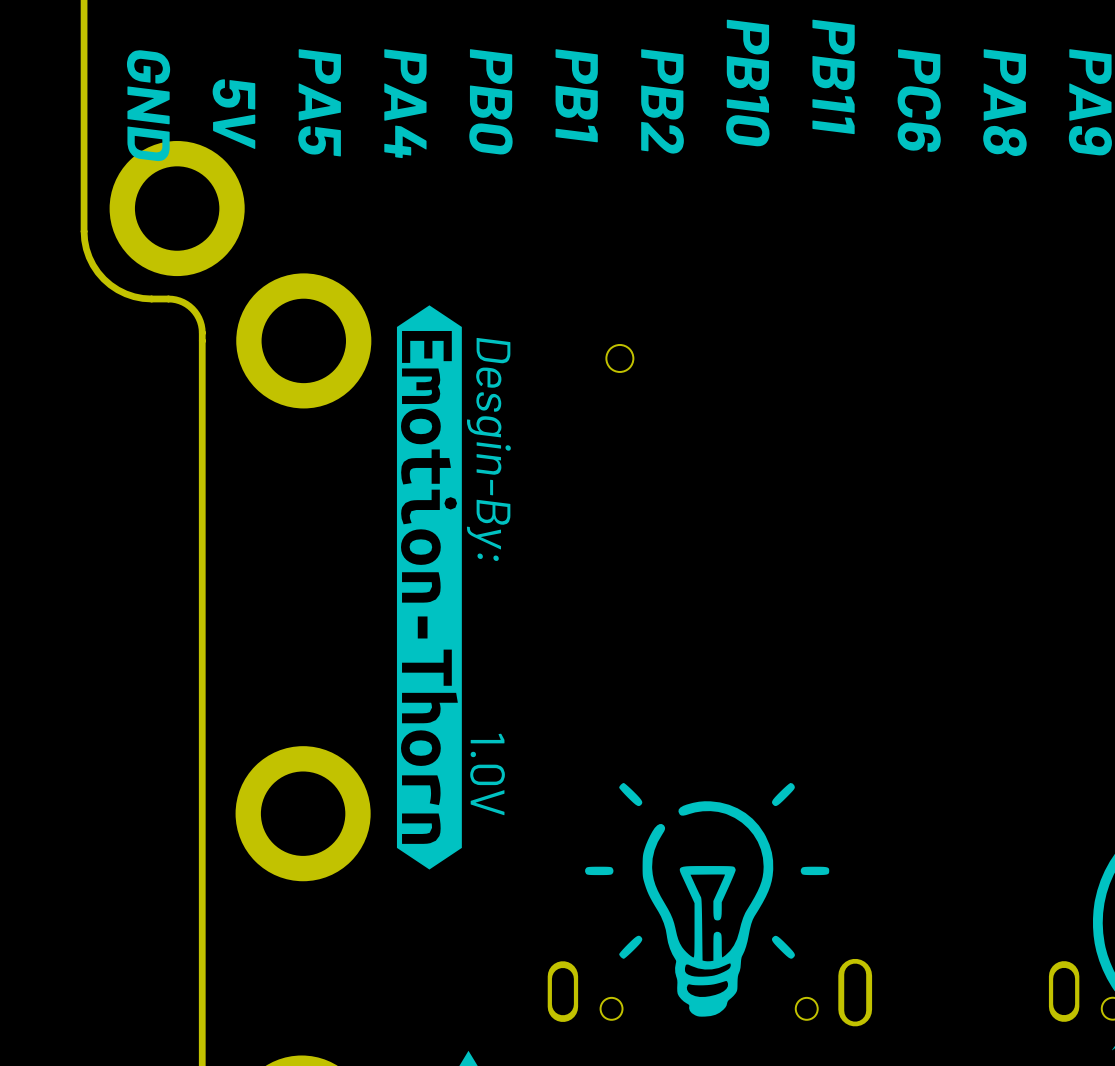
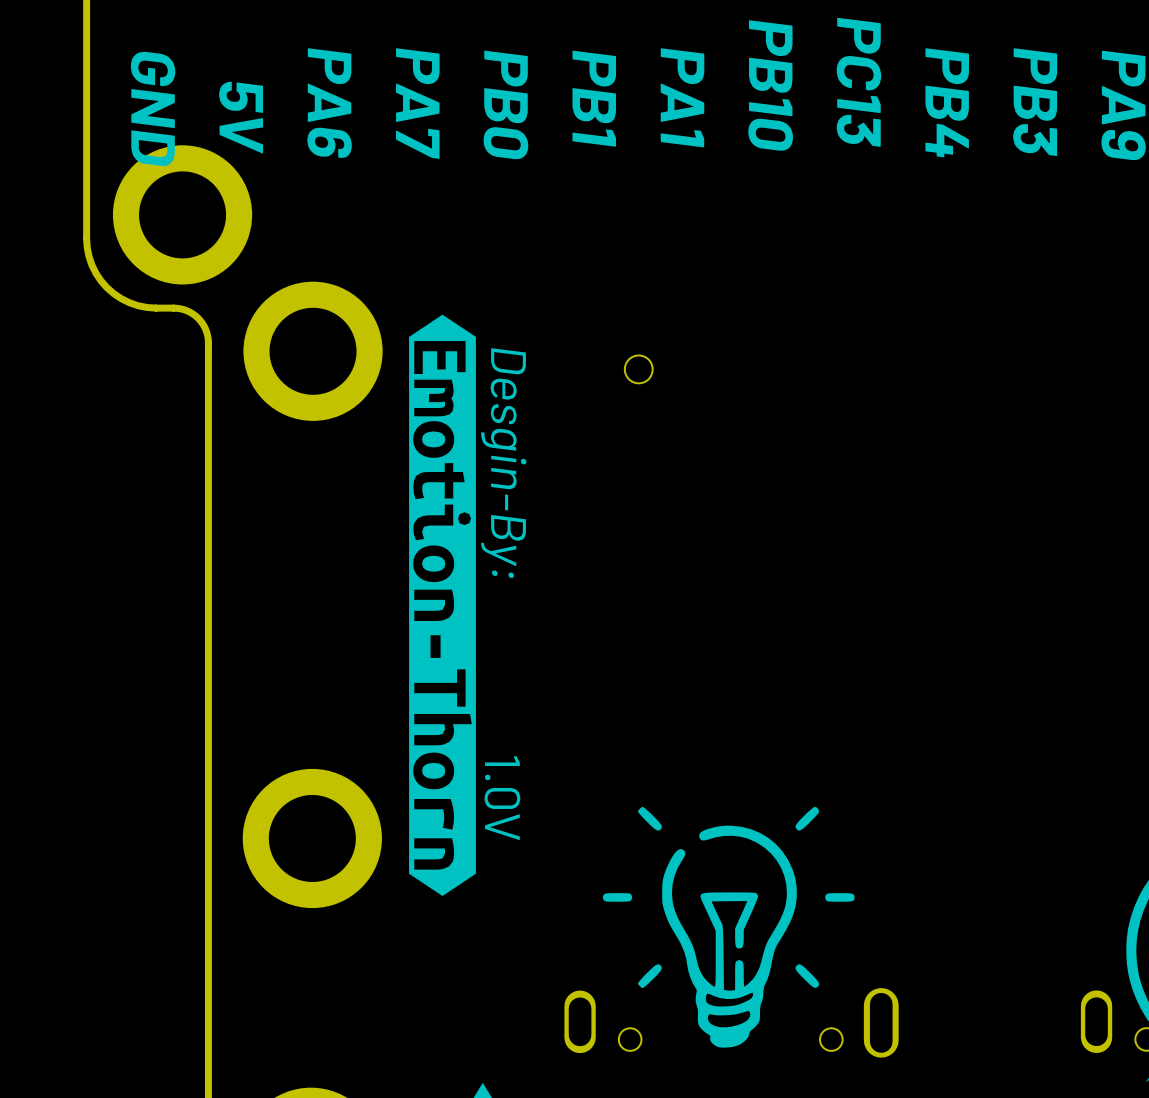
text: PB11 (833, 76) -> PC13 (858, 82)
text: PC6 (919, 100) -> PB4 (947, 102)
text: PB2 (662, 101) -> PA1 (682, 97)
text: PA5 (319, 102) -> PA6 (329, 103)
text: PA8 (1004, 102) -> PB3 (1035, 102)
text: PA4 (405, 103) -> PA7 (417, 103)

